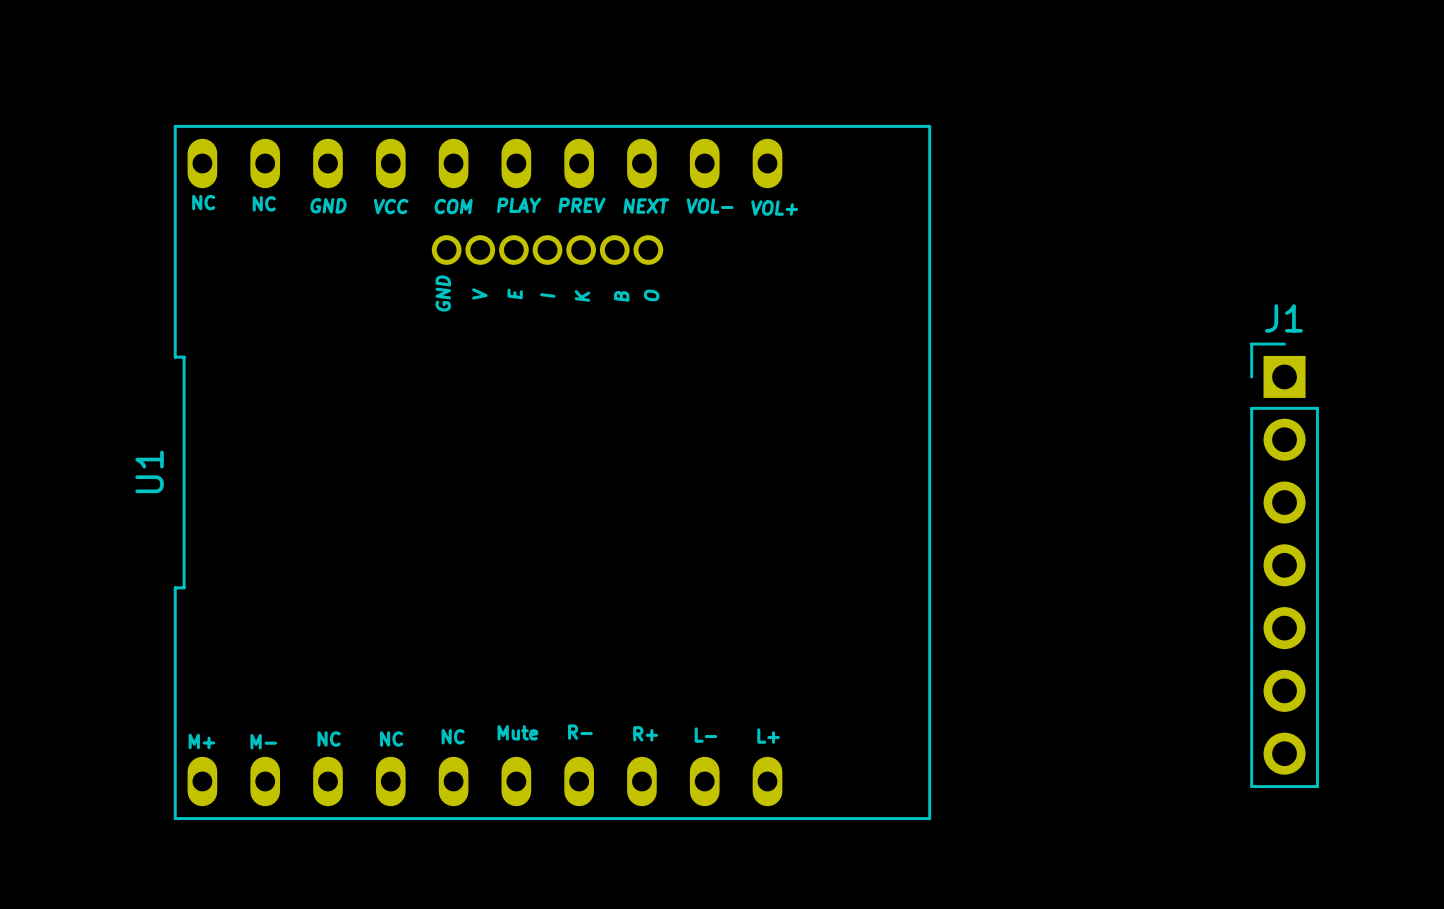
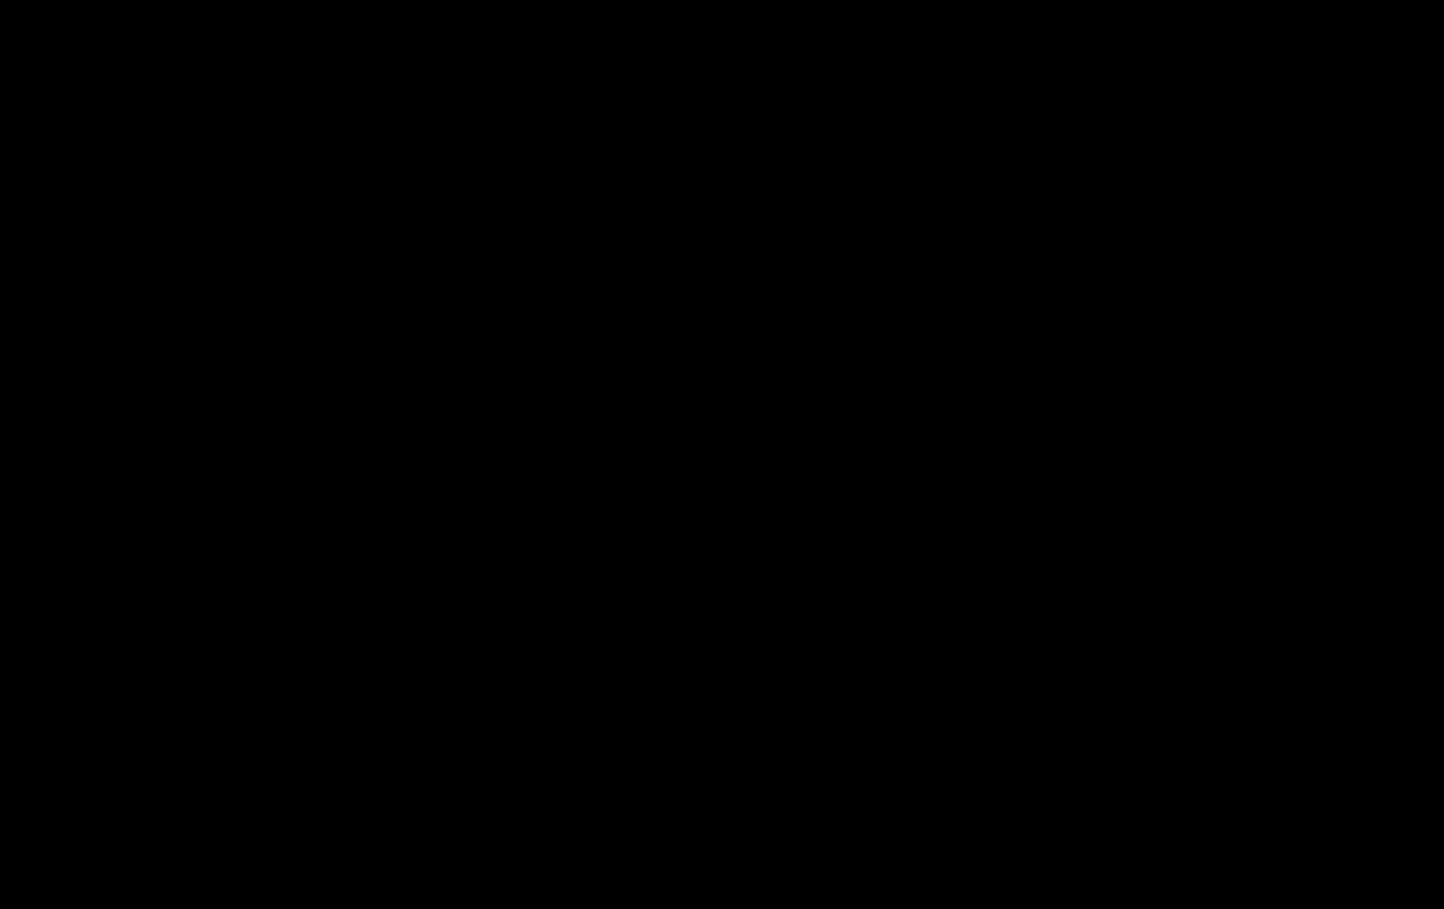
U1: (552, 472) -> none
J1: (1284, 565) -> none

